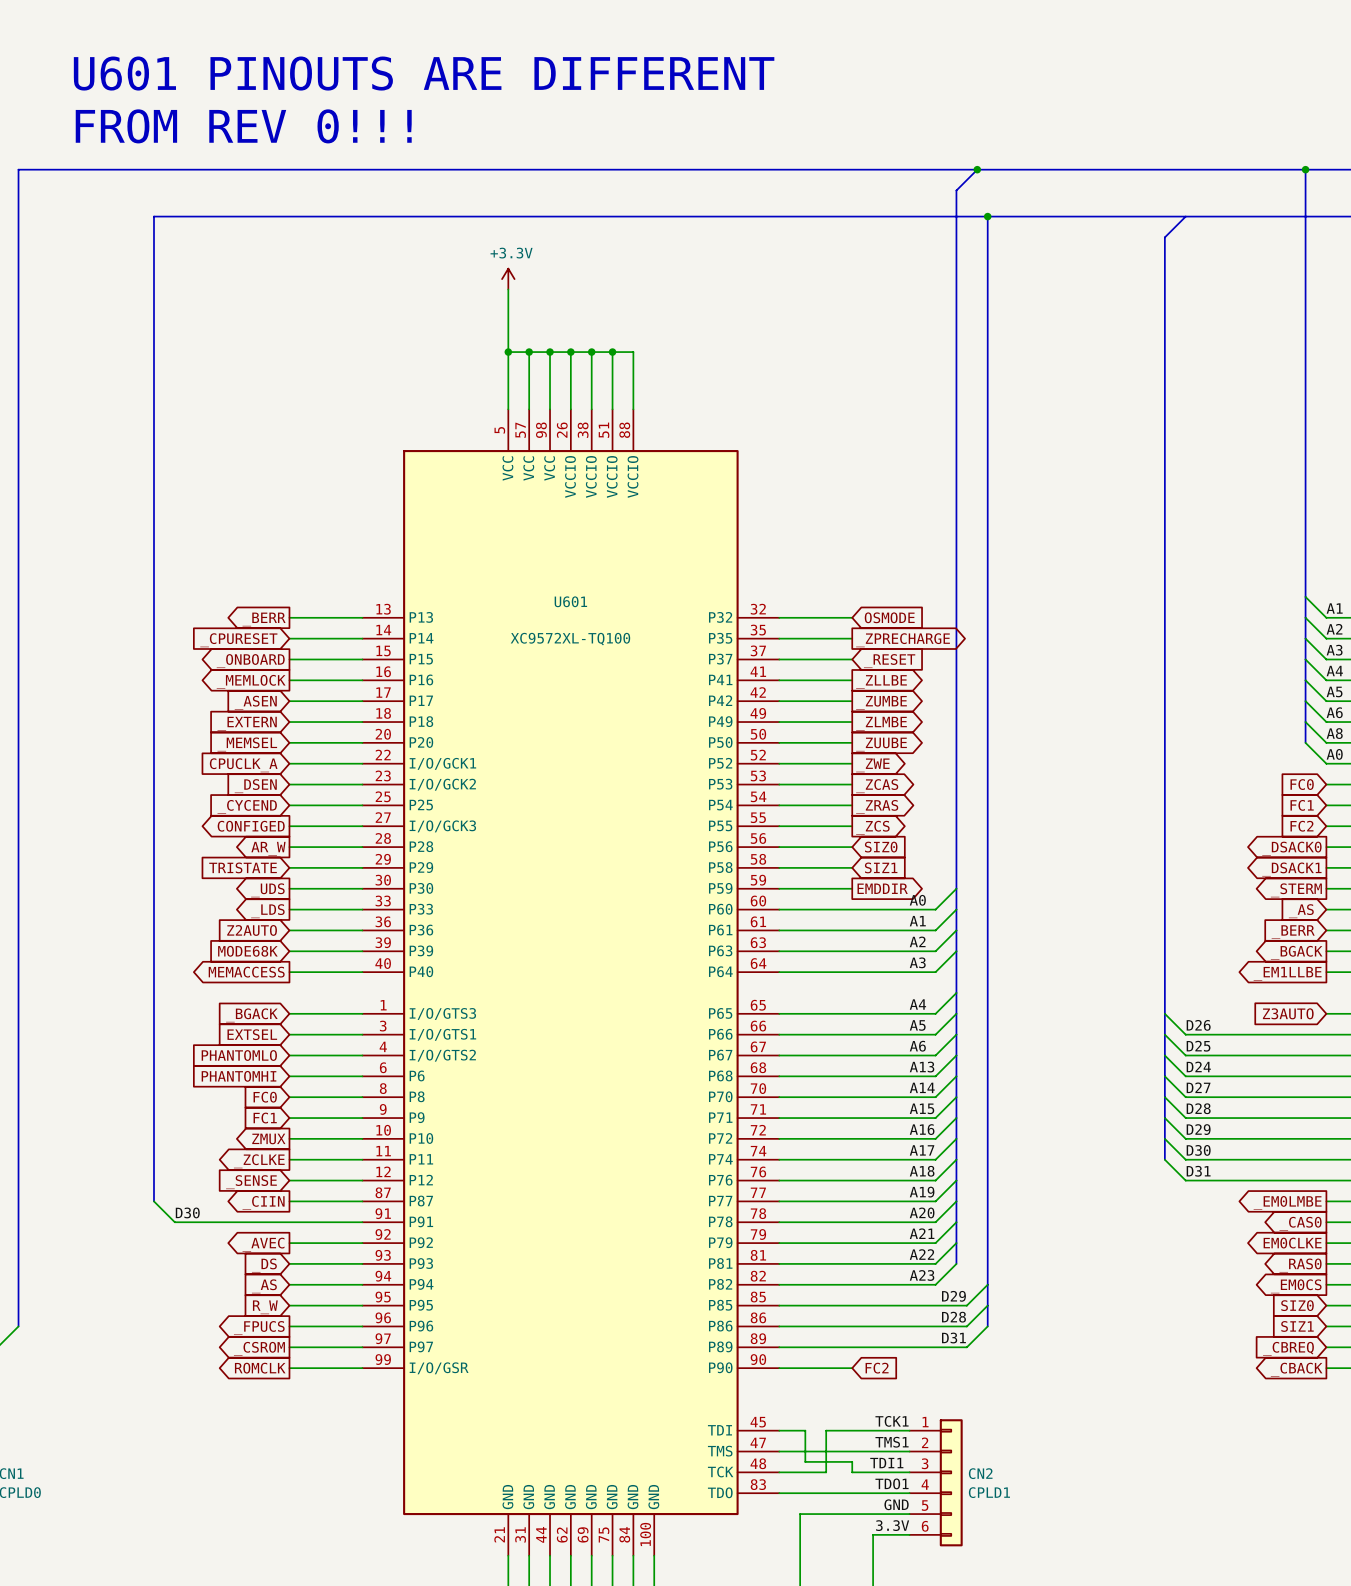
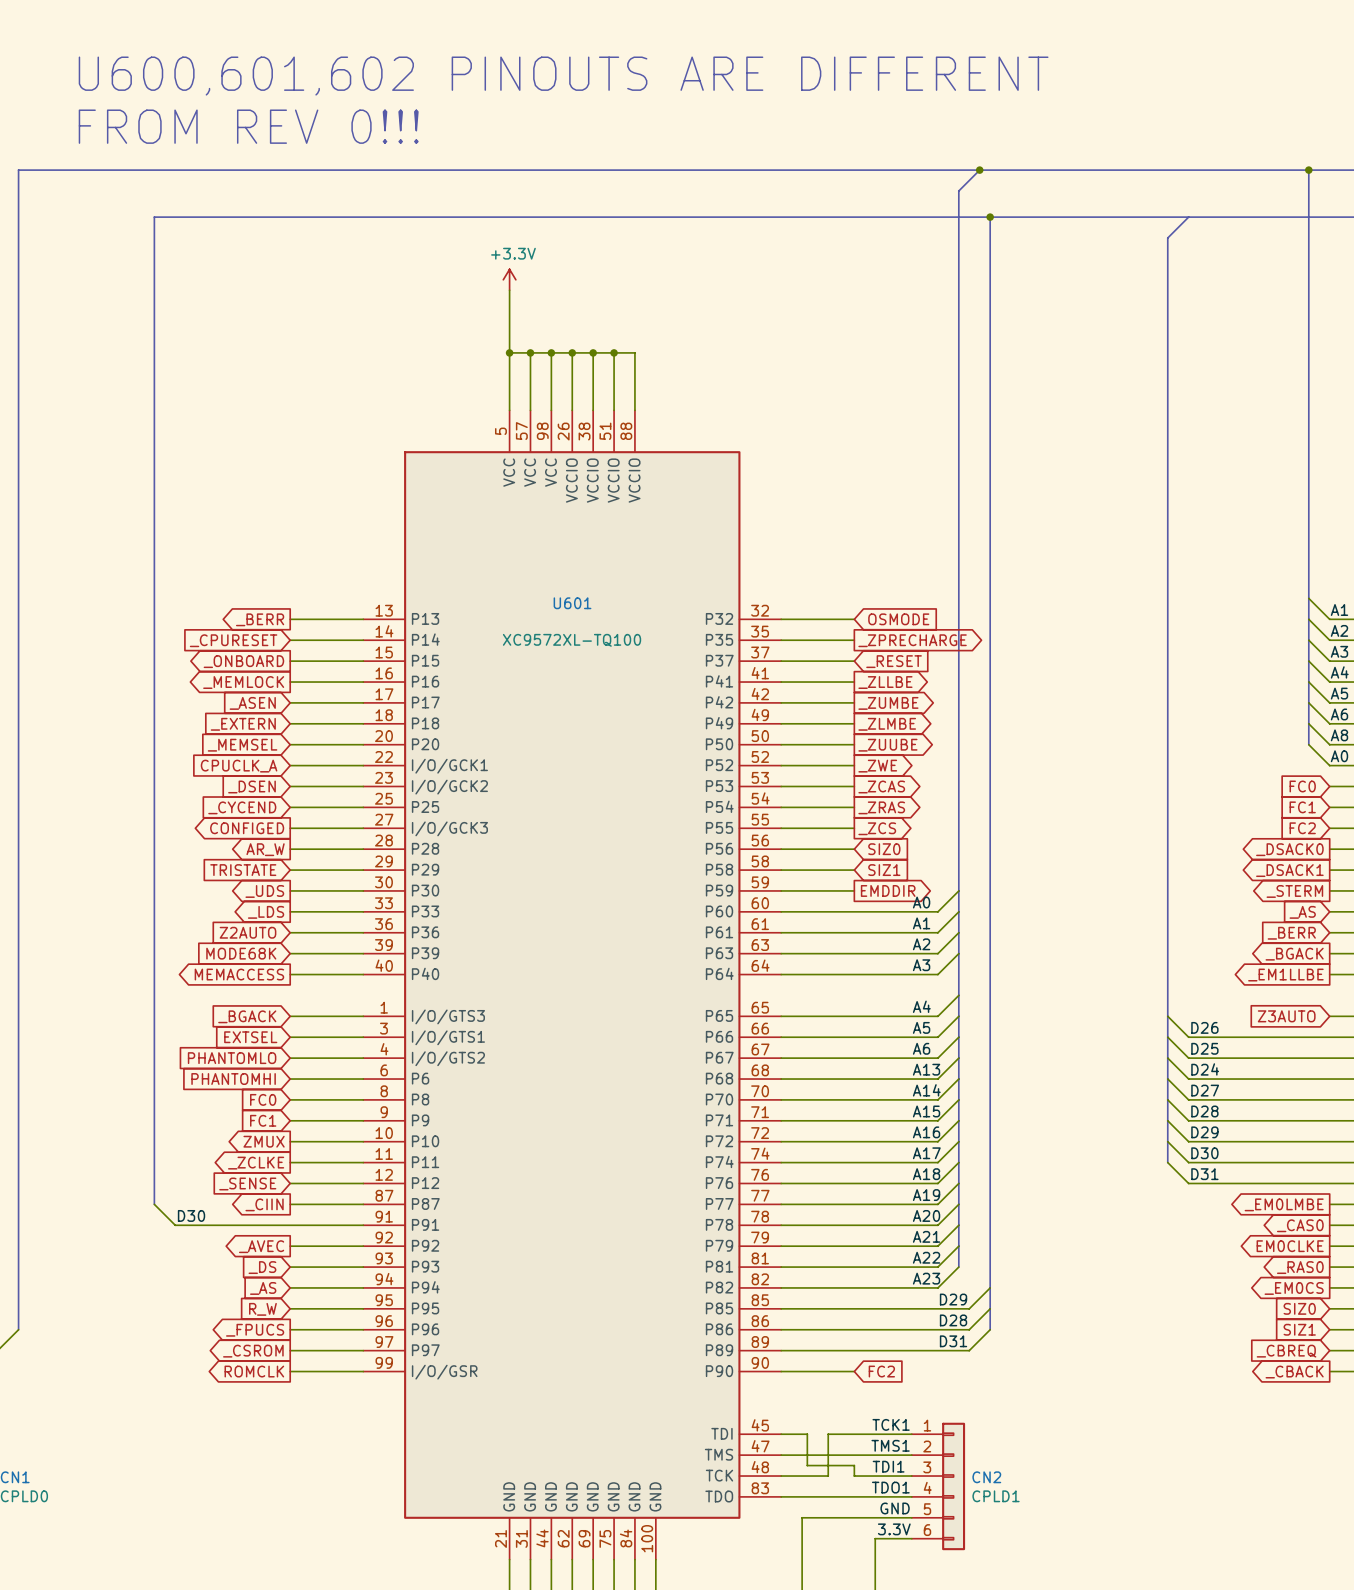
text: U601 PINOUTS ARE DIFFERENT (424, 73) -> U600,601,602 PINOUTS ARE DIFFERENT (563, 76)

